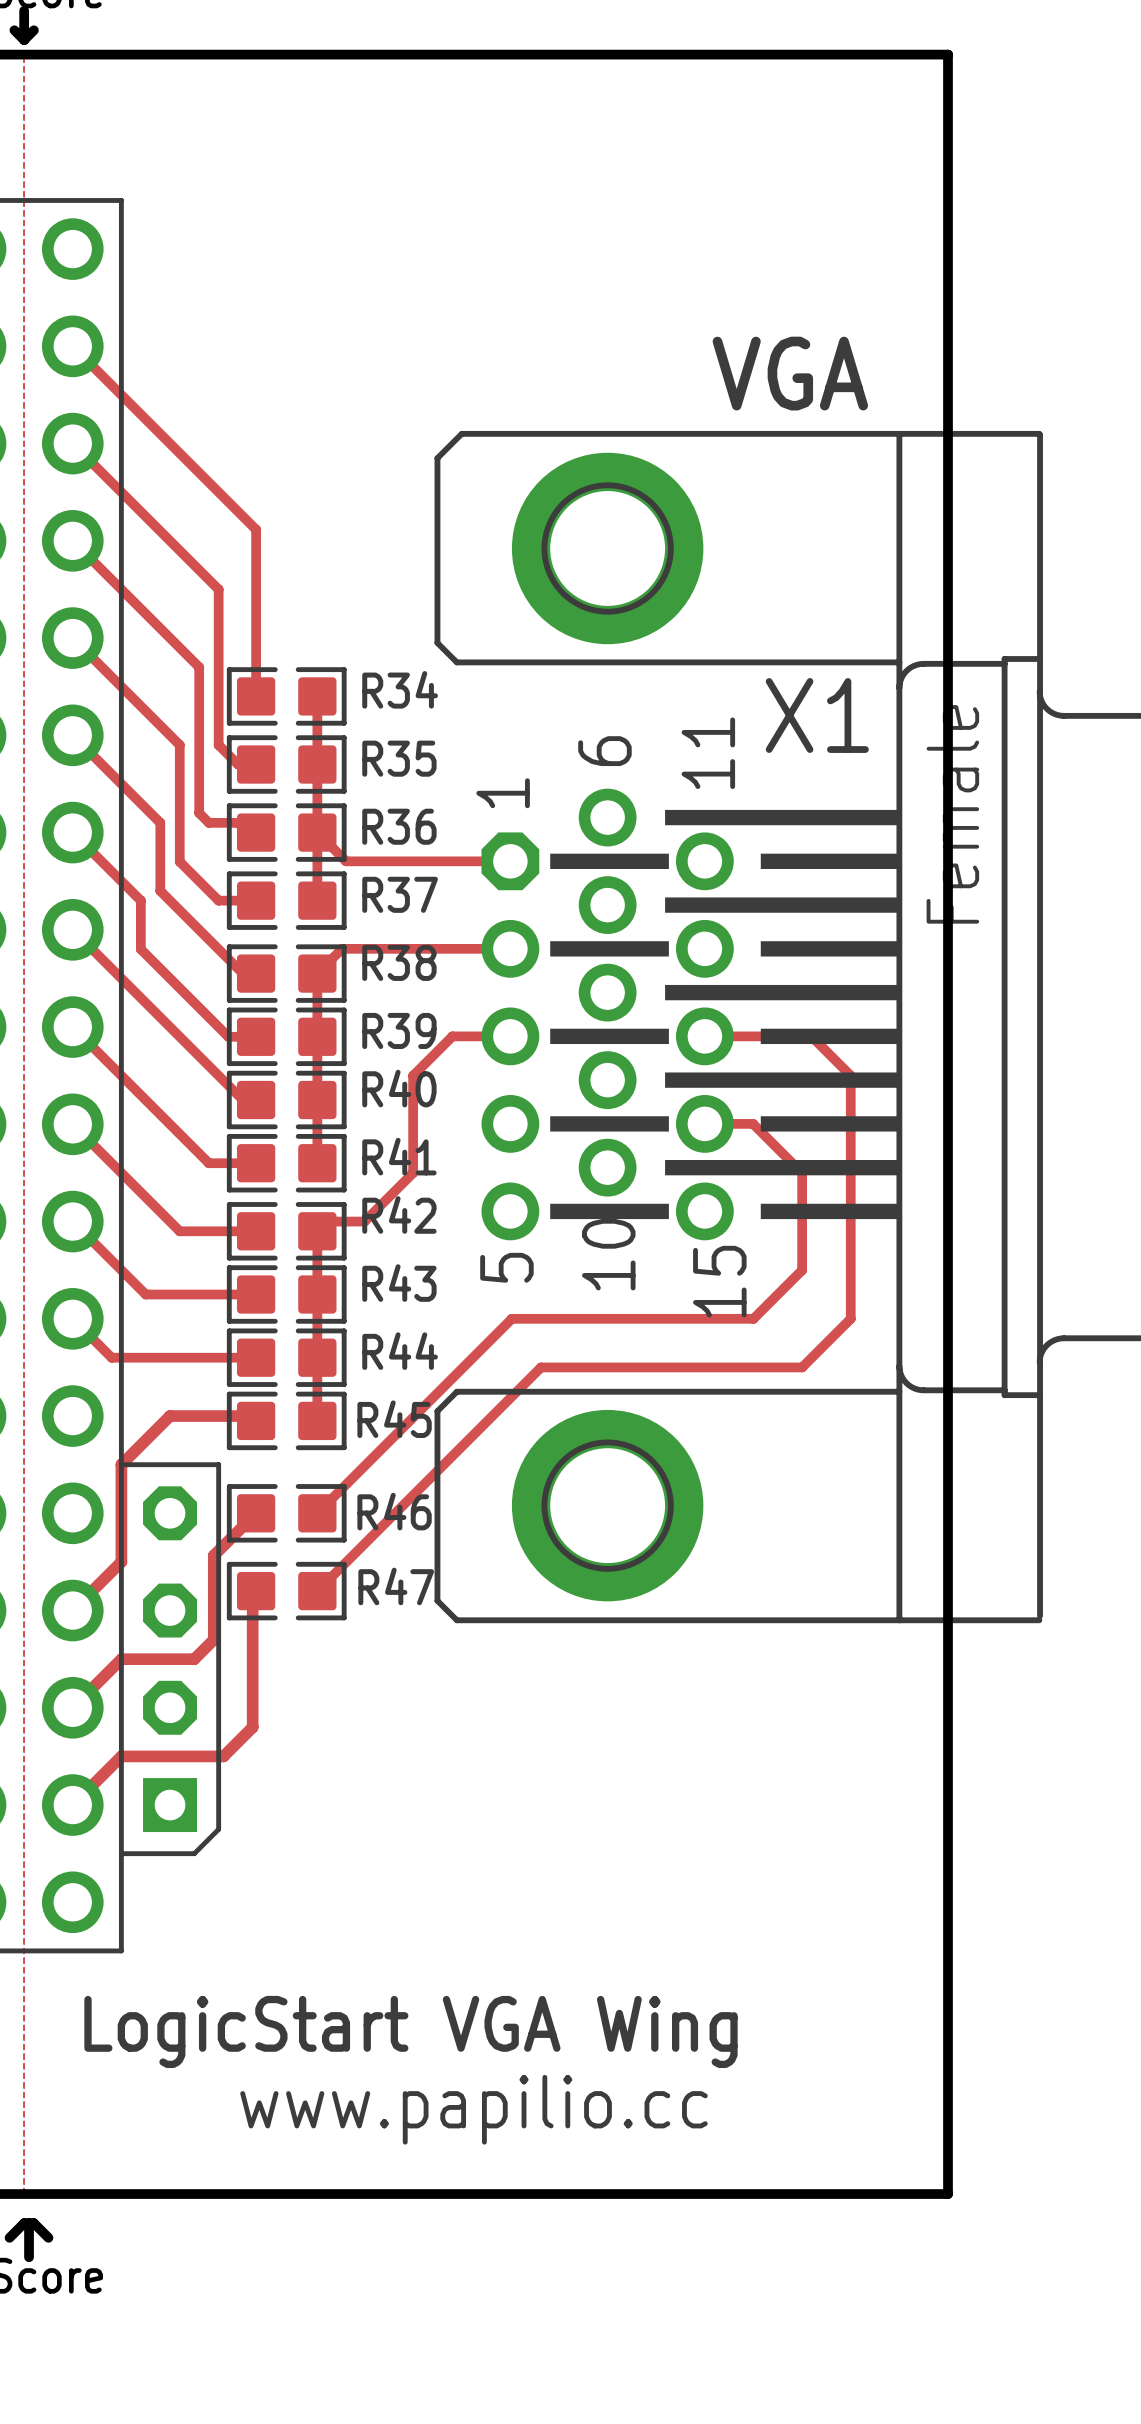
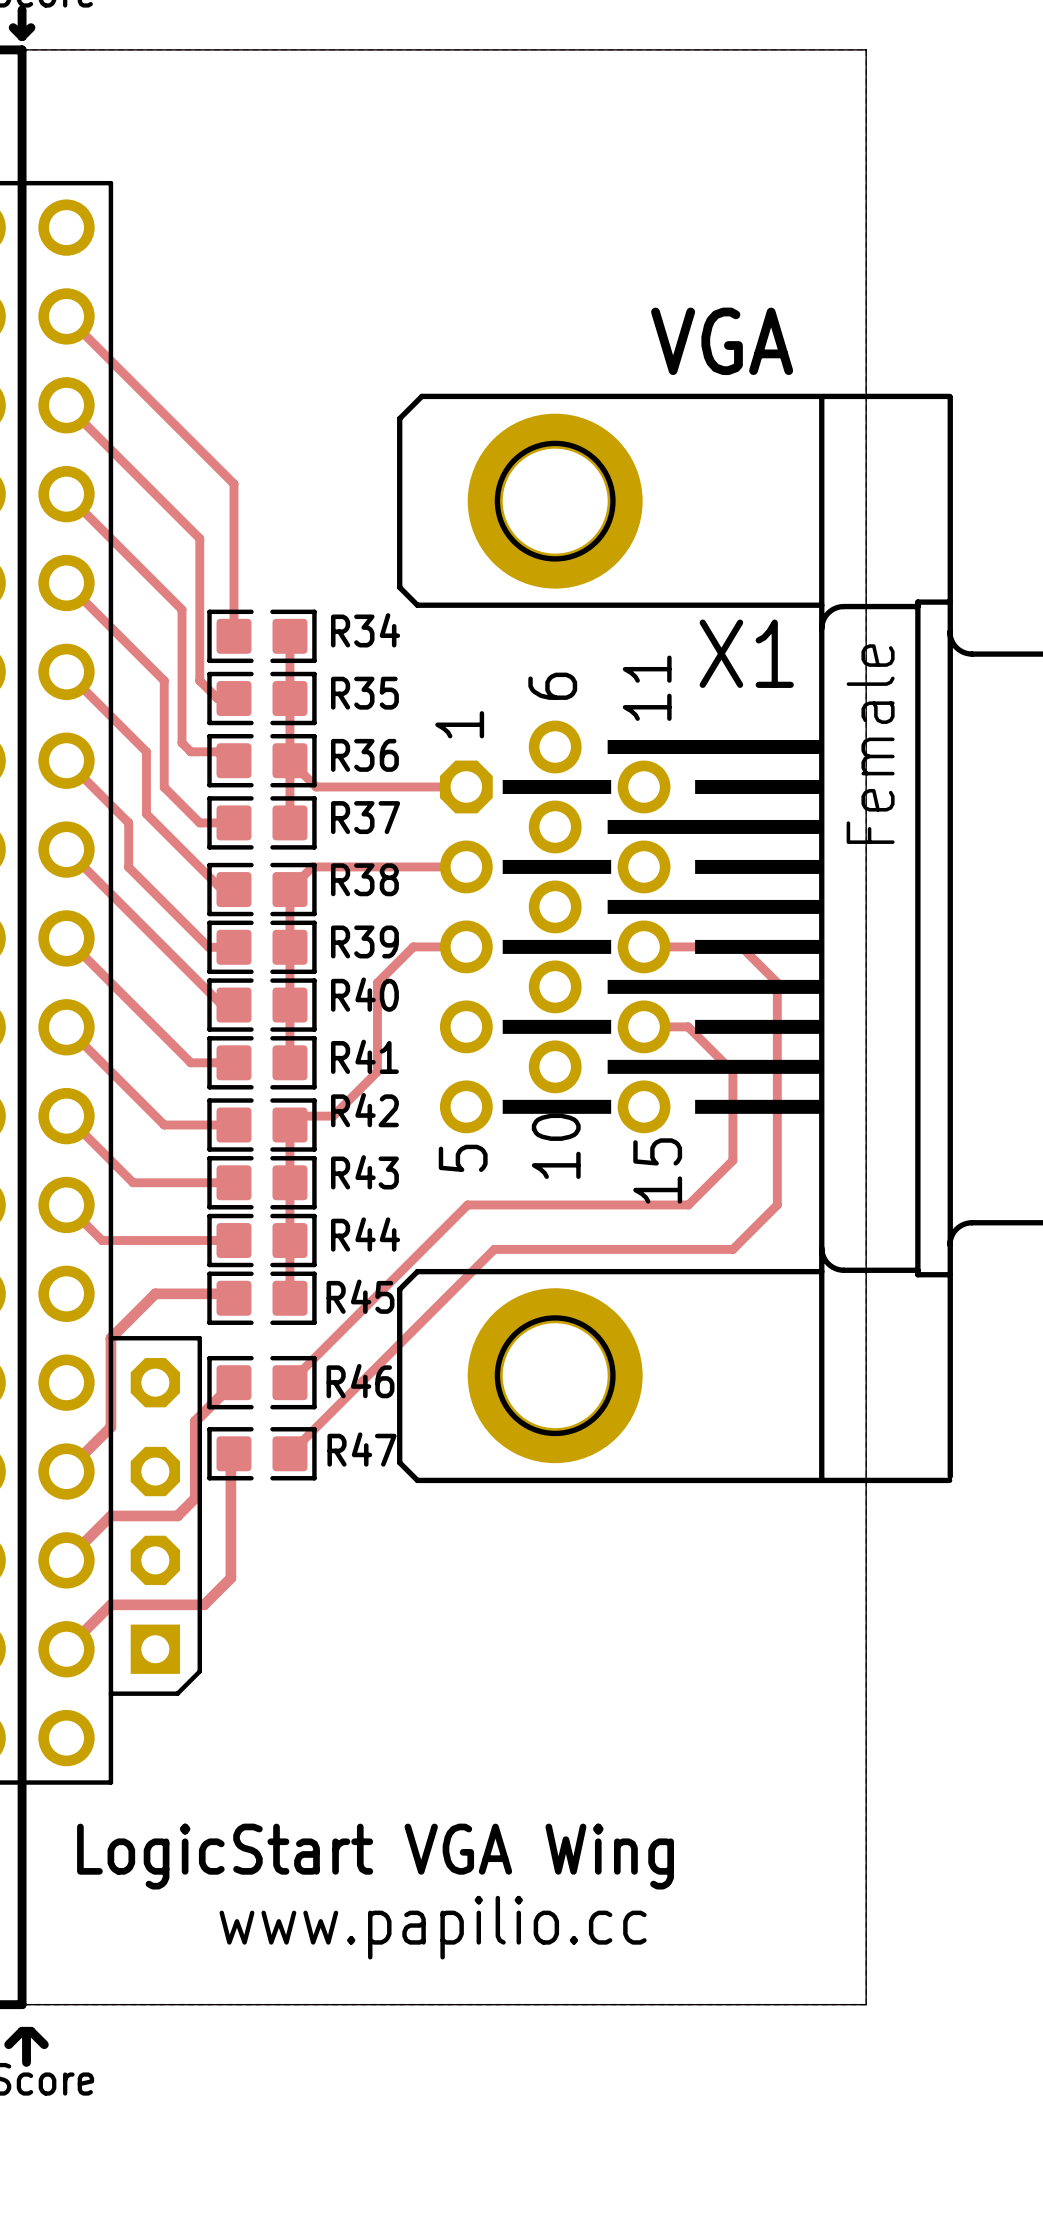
board edge: none -> (22, 49) (22, 2004)
board edge width: thick (24, 54) (948, 54) (948, 2194) (24, 2194) -> thin (22, 49) (866, 49) (866, 2004) (22, 2004)

